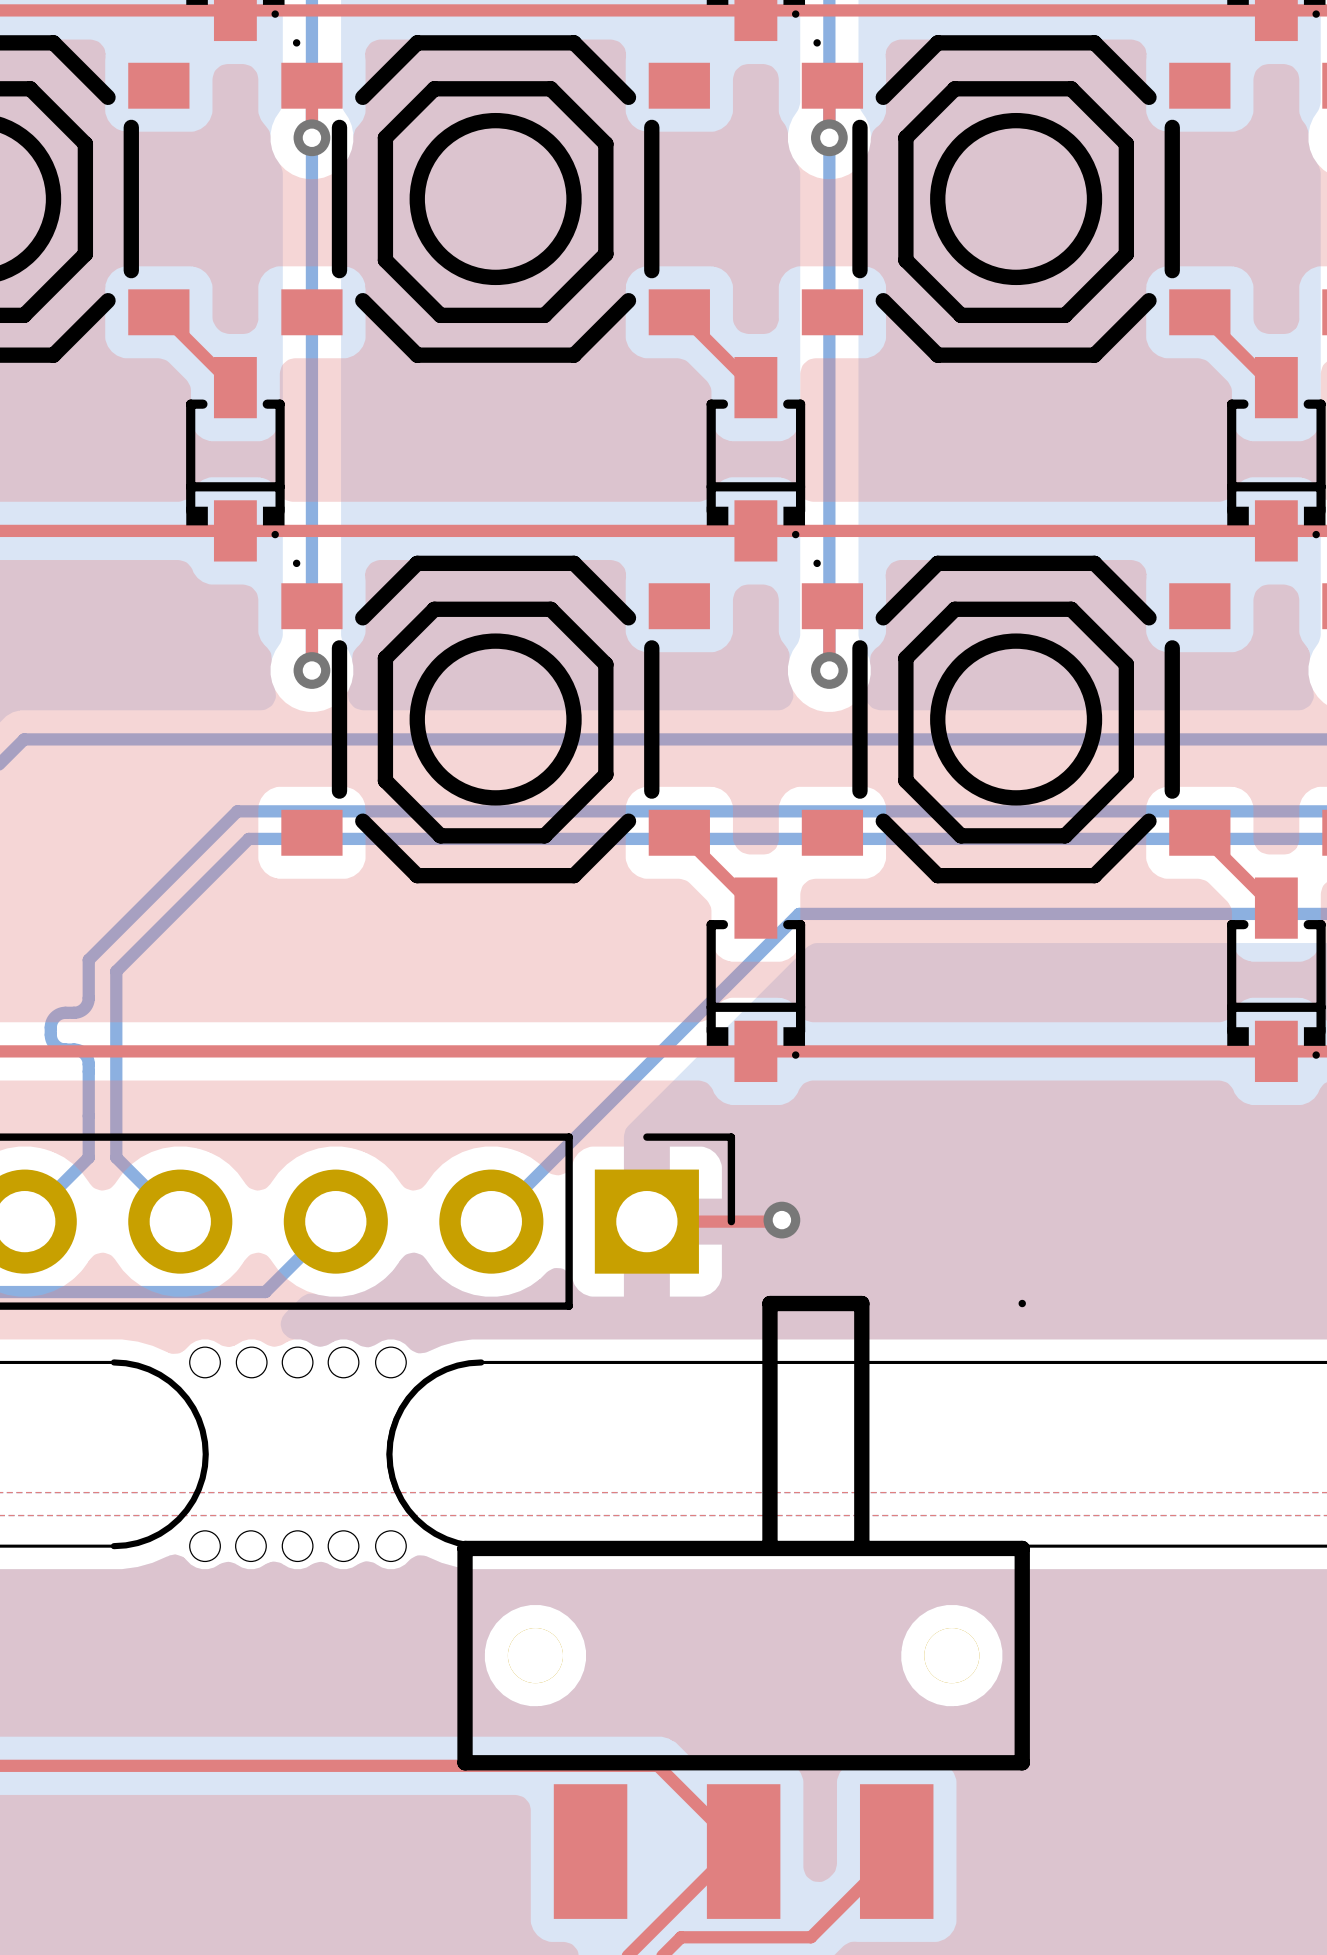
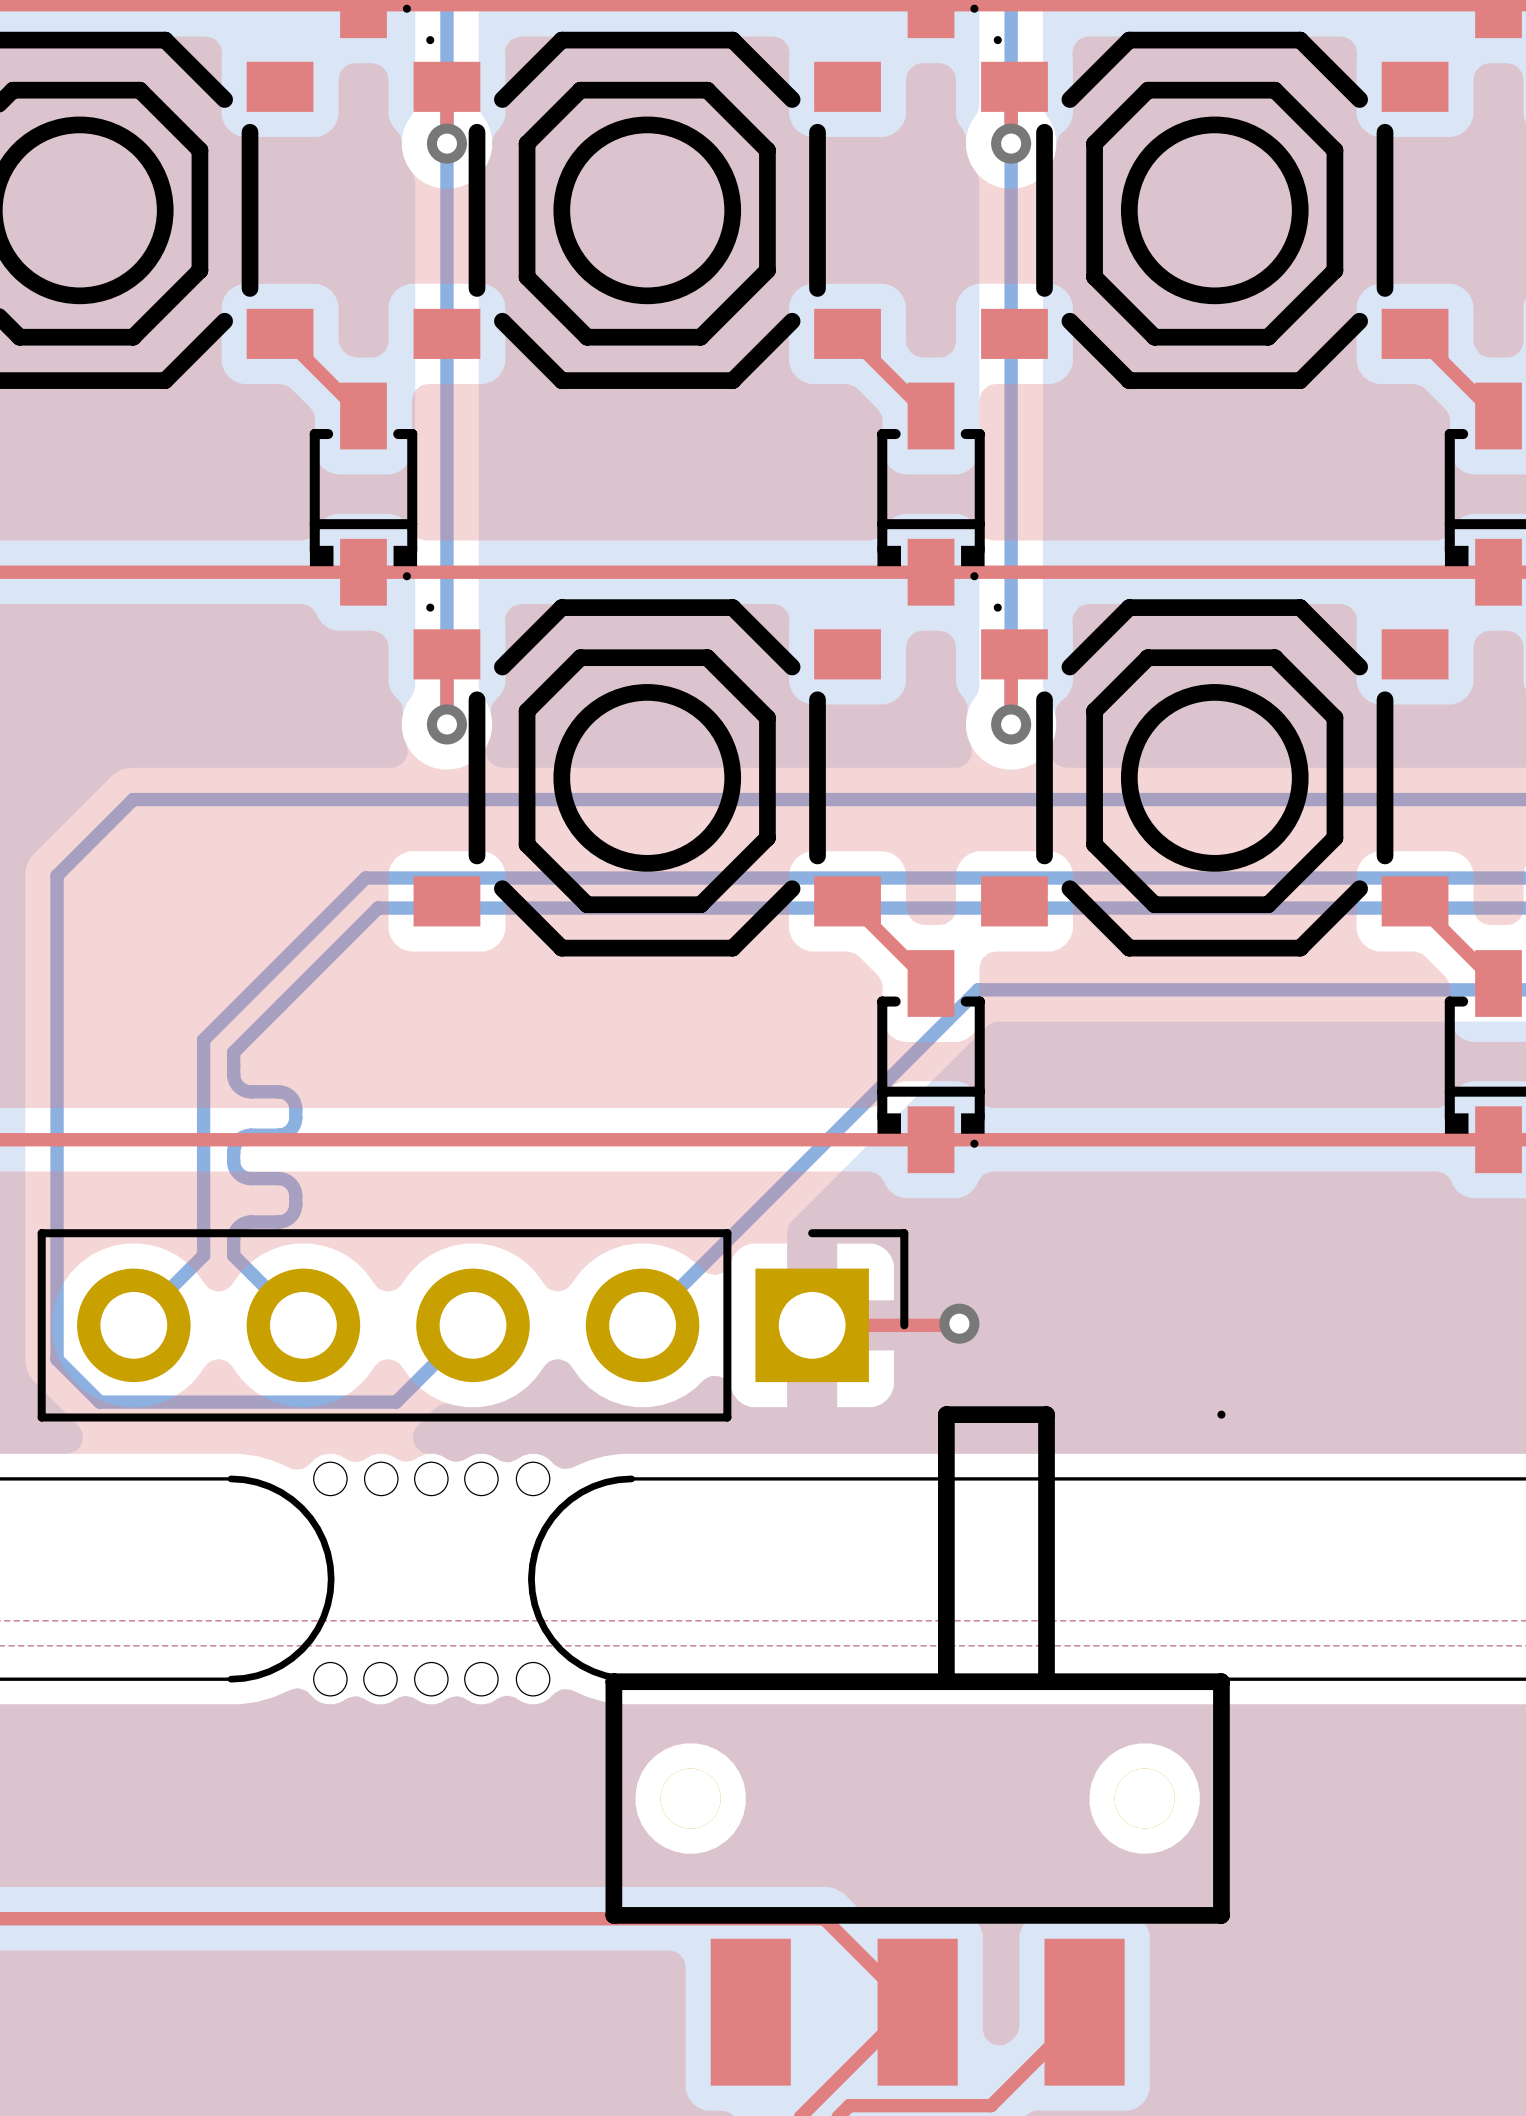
bottom track: (116, 991) (116, 1063) -> (233, 1074) (237, 1085) (245, 1090) (280, 1091) (287, 1094) (293, 1099) (295, 1109) (294, 1123) (287, 1132) (280, 1135) (245, 1136) (237, 1141) (233, 1152)
bottom track: (88, 998) (86, 1005) (80, 1011) (62, 1013) (56, 1016) (50, 1027) (51, 1038) (55, 1045) (62, 1049) (81, 1051) (86, 1056) (88, 1064) -> (203, 1081) (203, 1153)
bottom track: (116, 1071) (116, 1142) -> (233, 1161) (236, 1170) (245, 1177) (280, 1178) (287, 1181) (293, 1186) (295, 1195) (294, 1210) (287, 1219) (280, 1221) (245, 1222) (237, 1228) (233, 1239)

